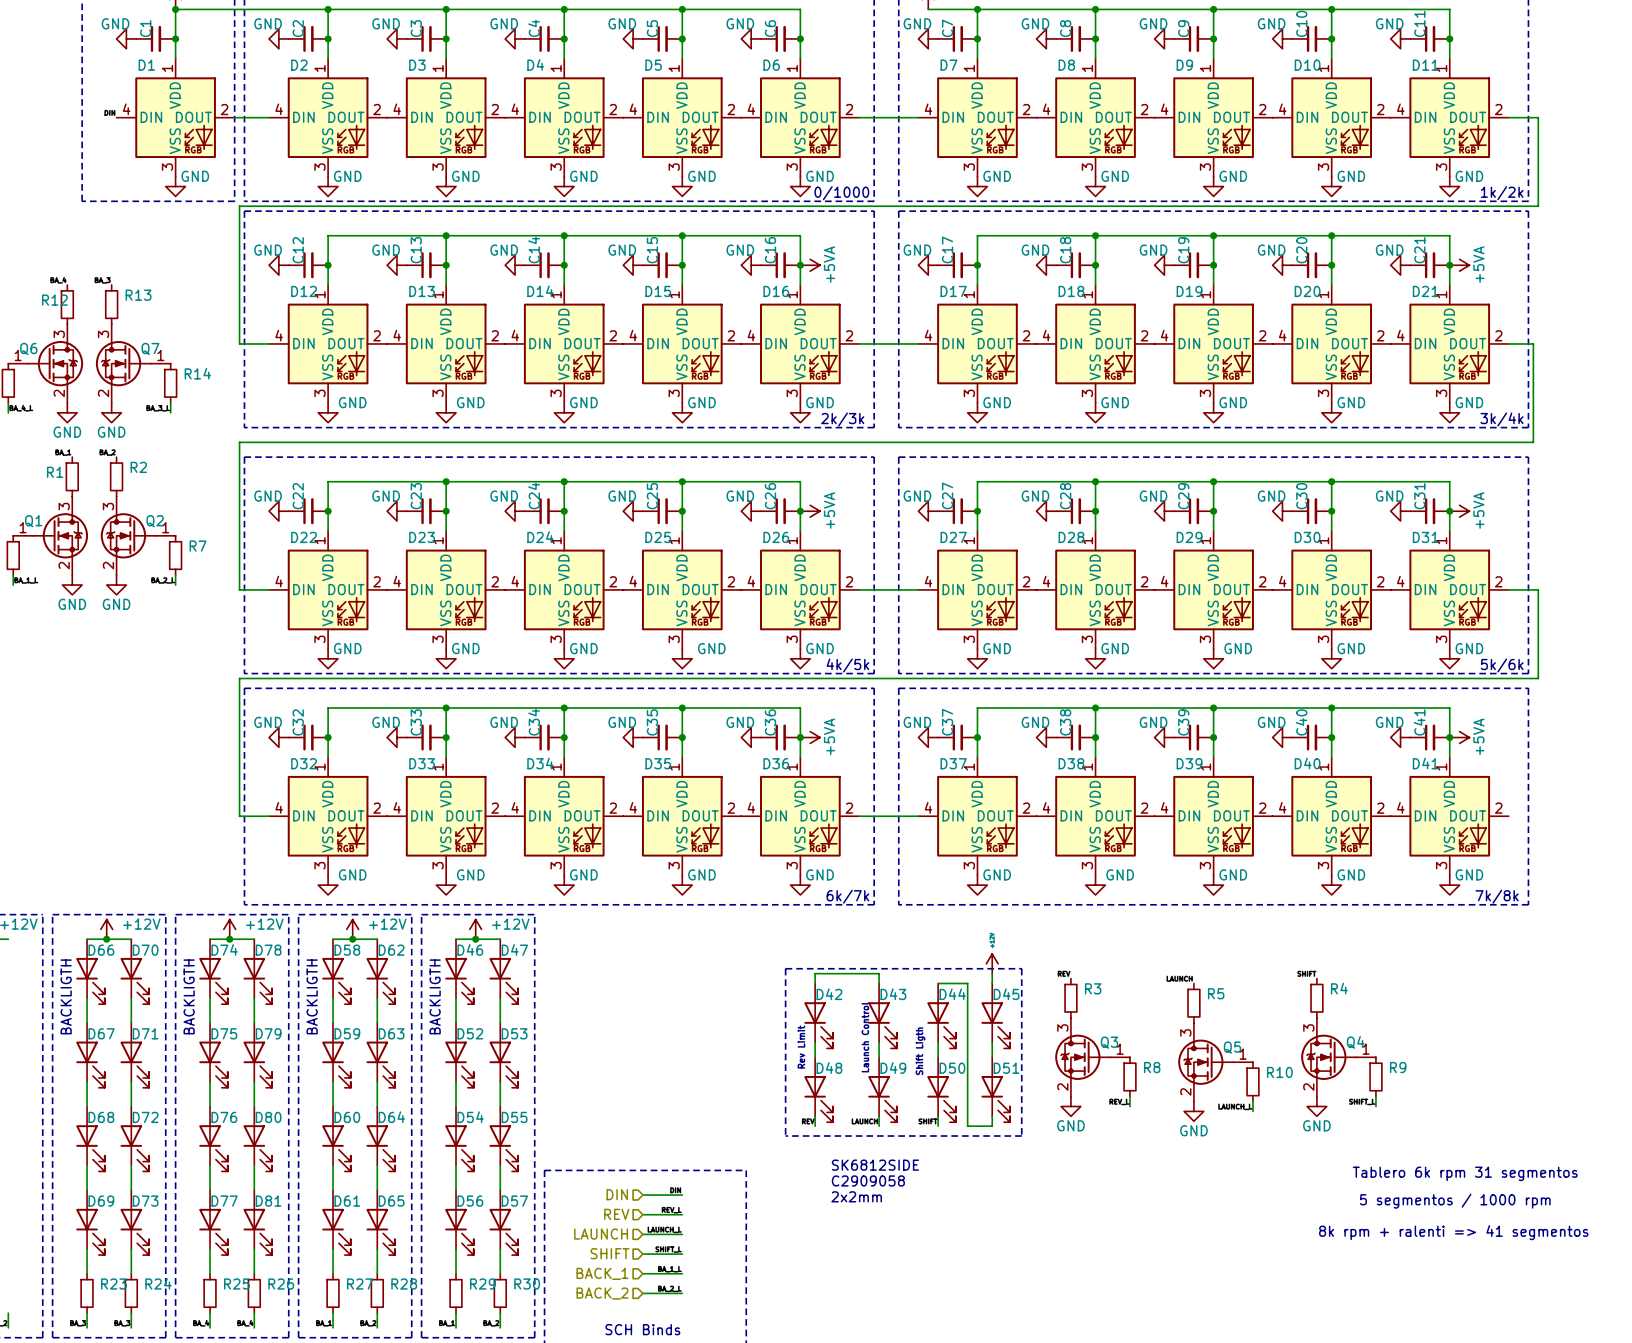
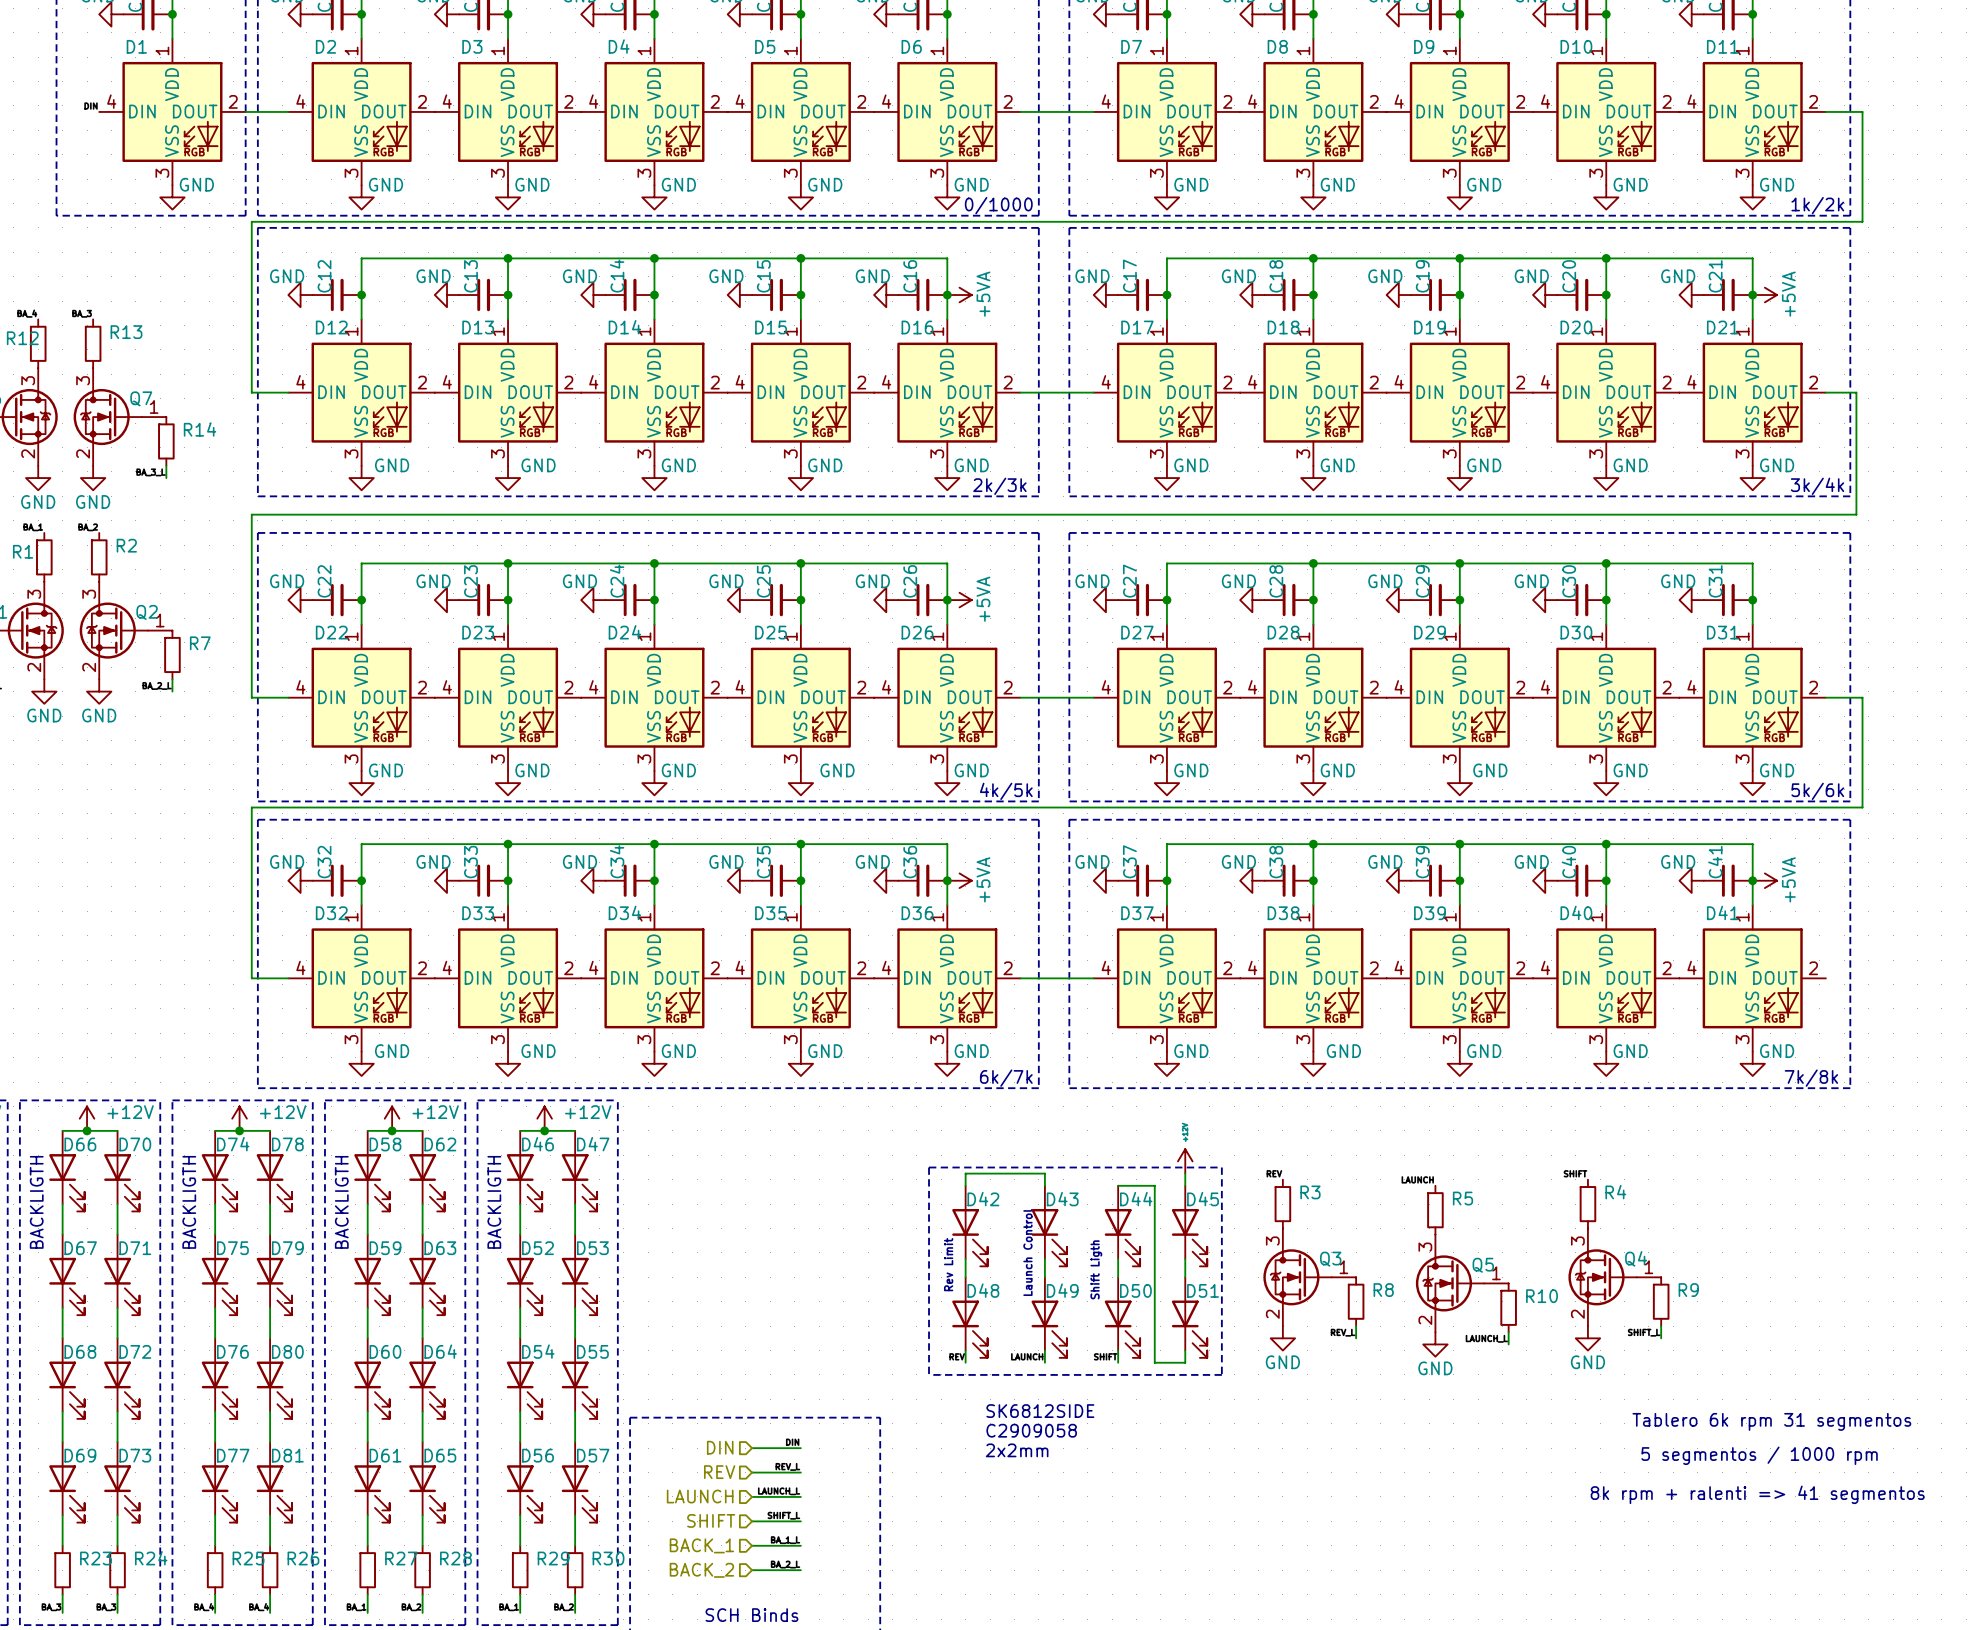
power symbol: +5VA (1459, 511) -> none

